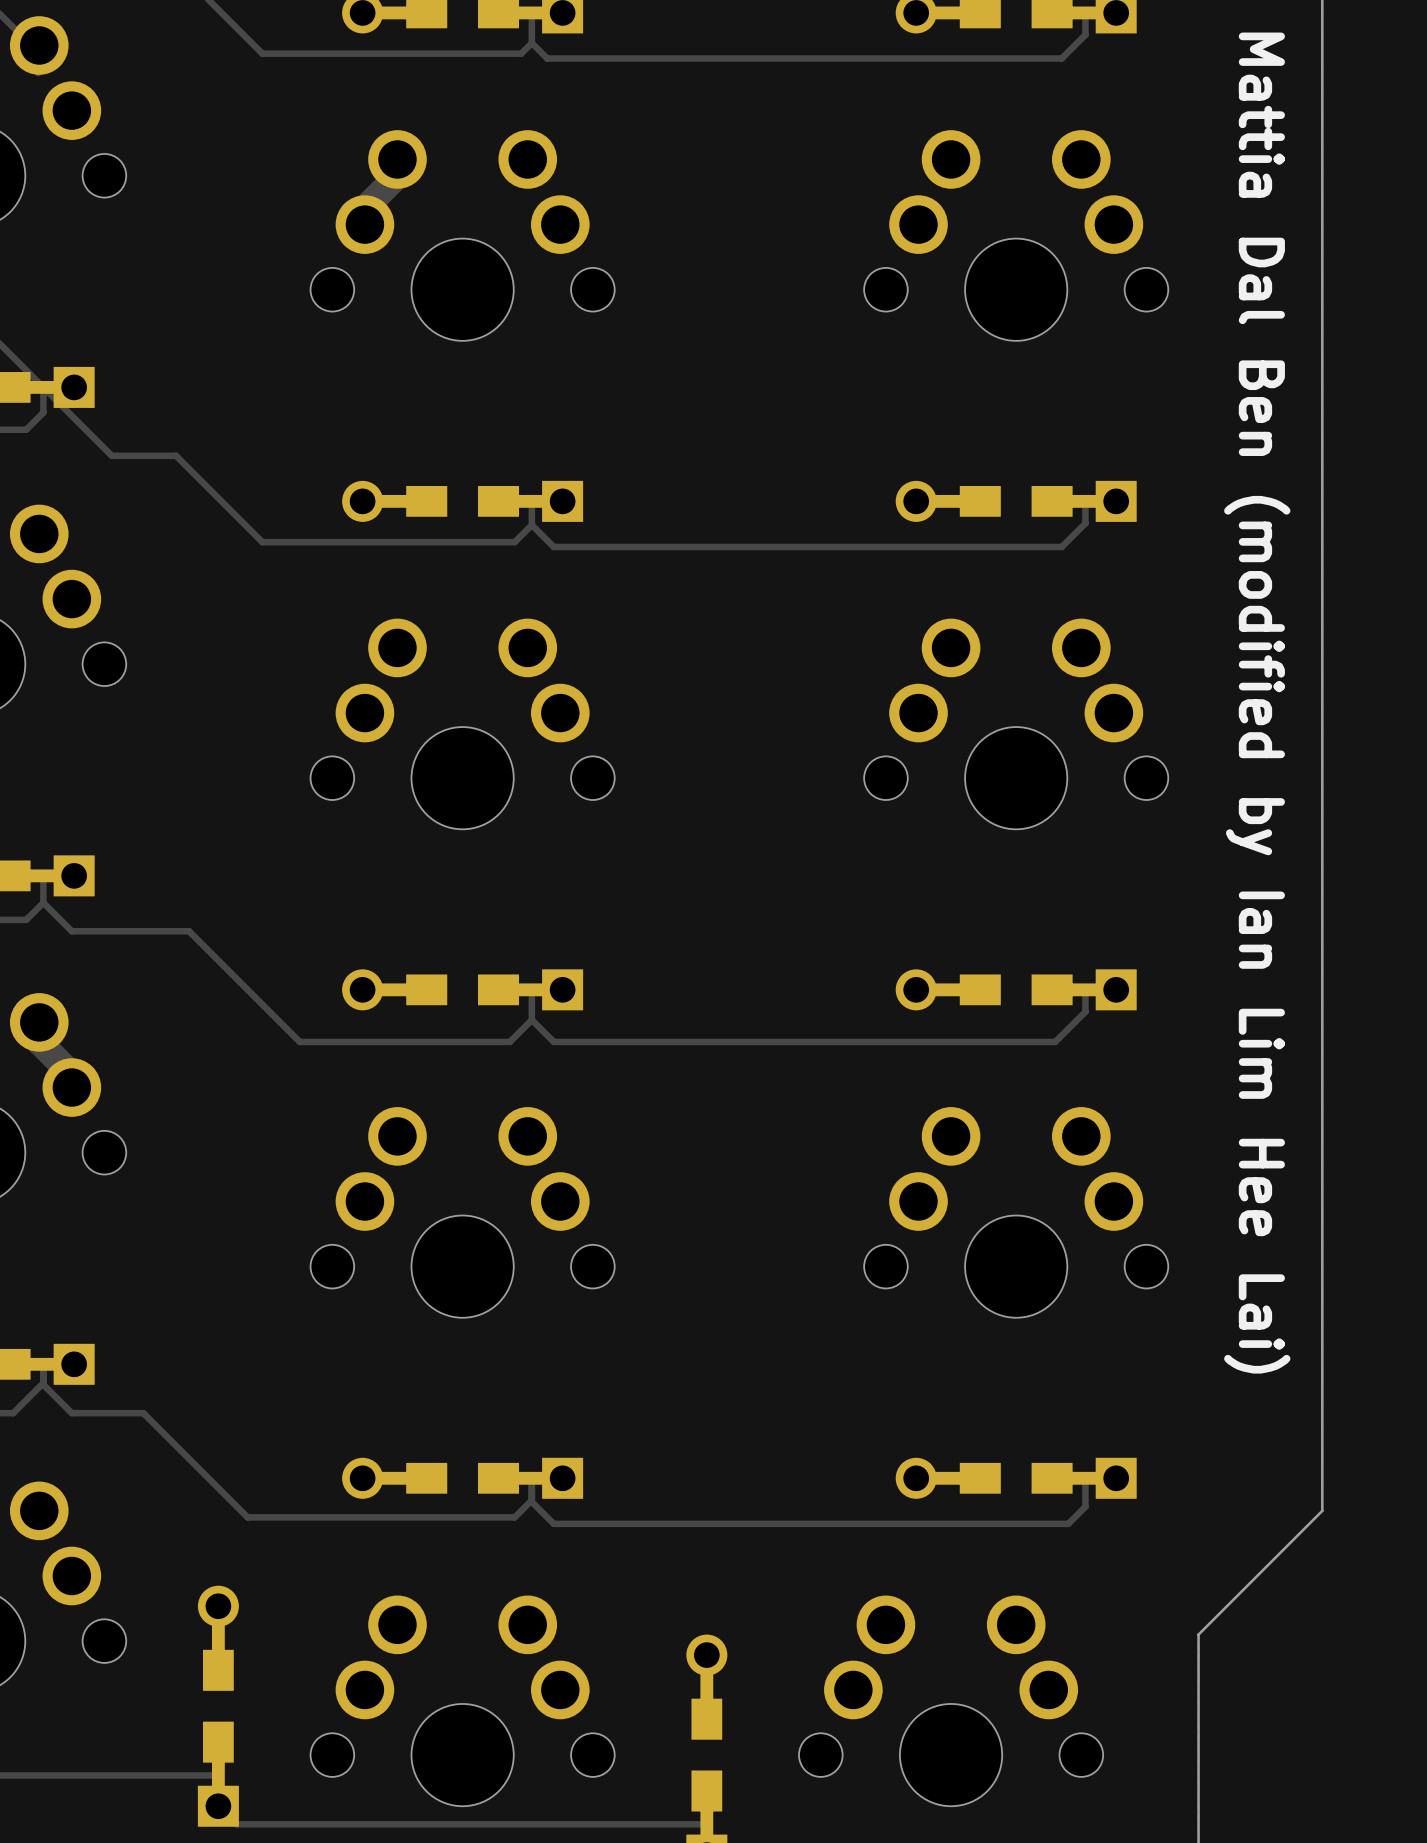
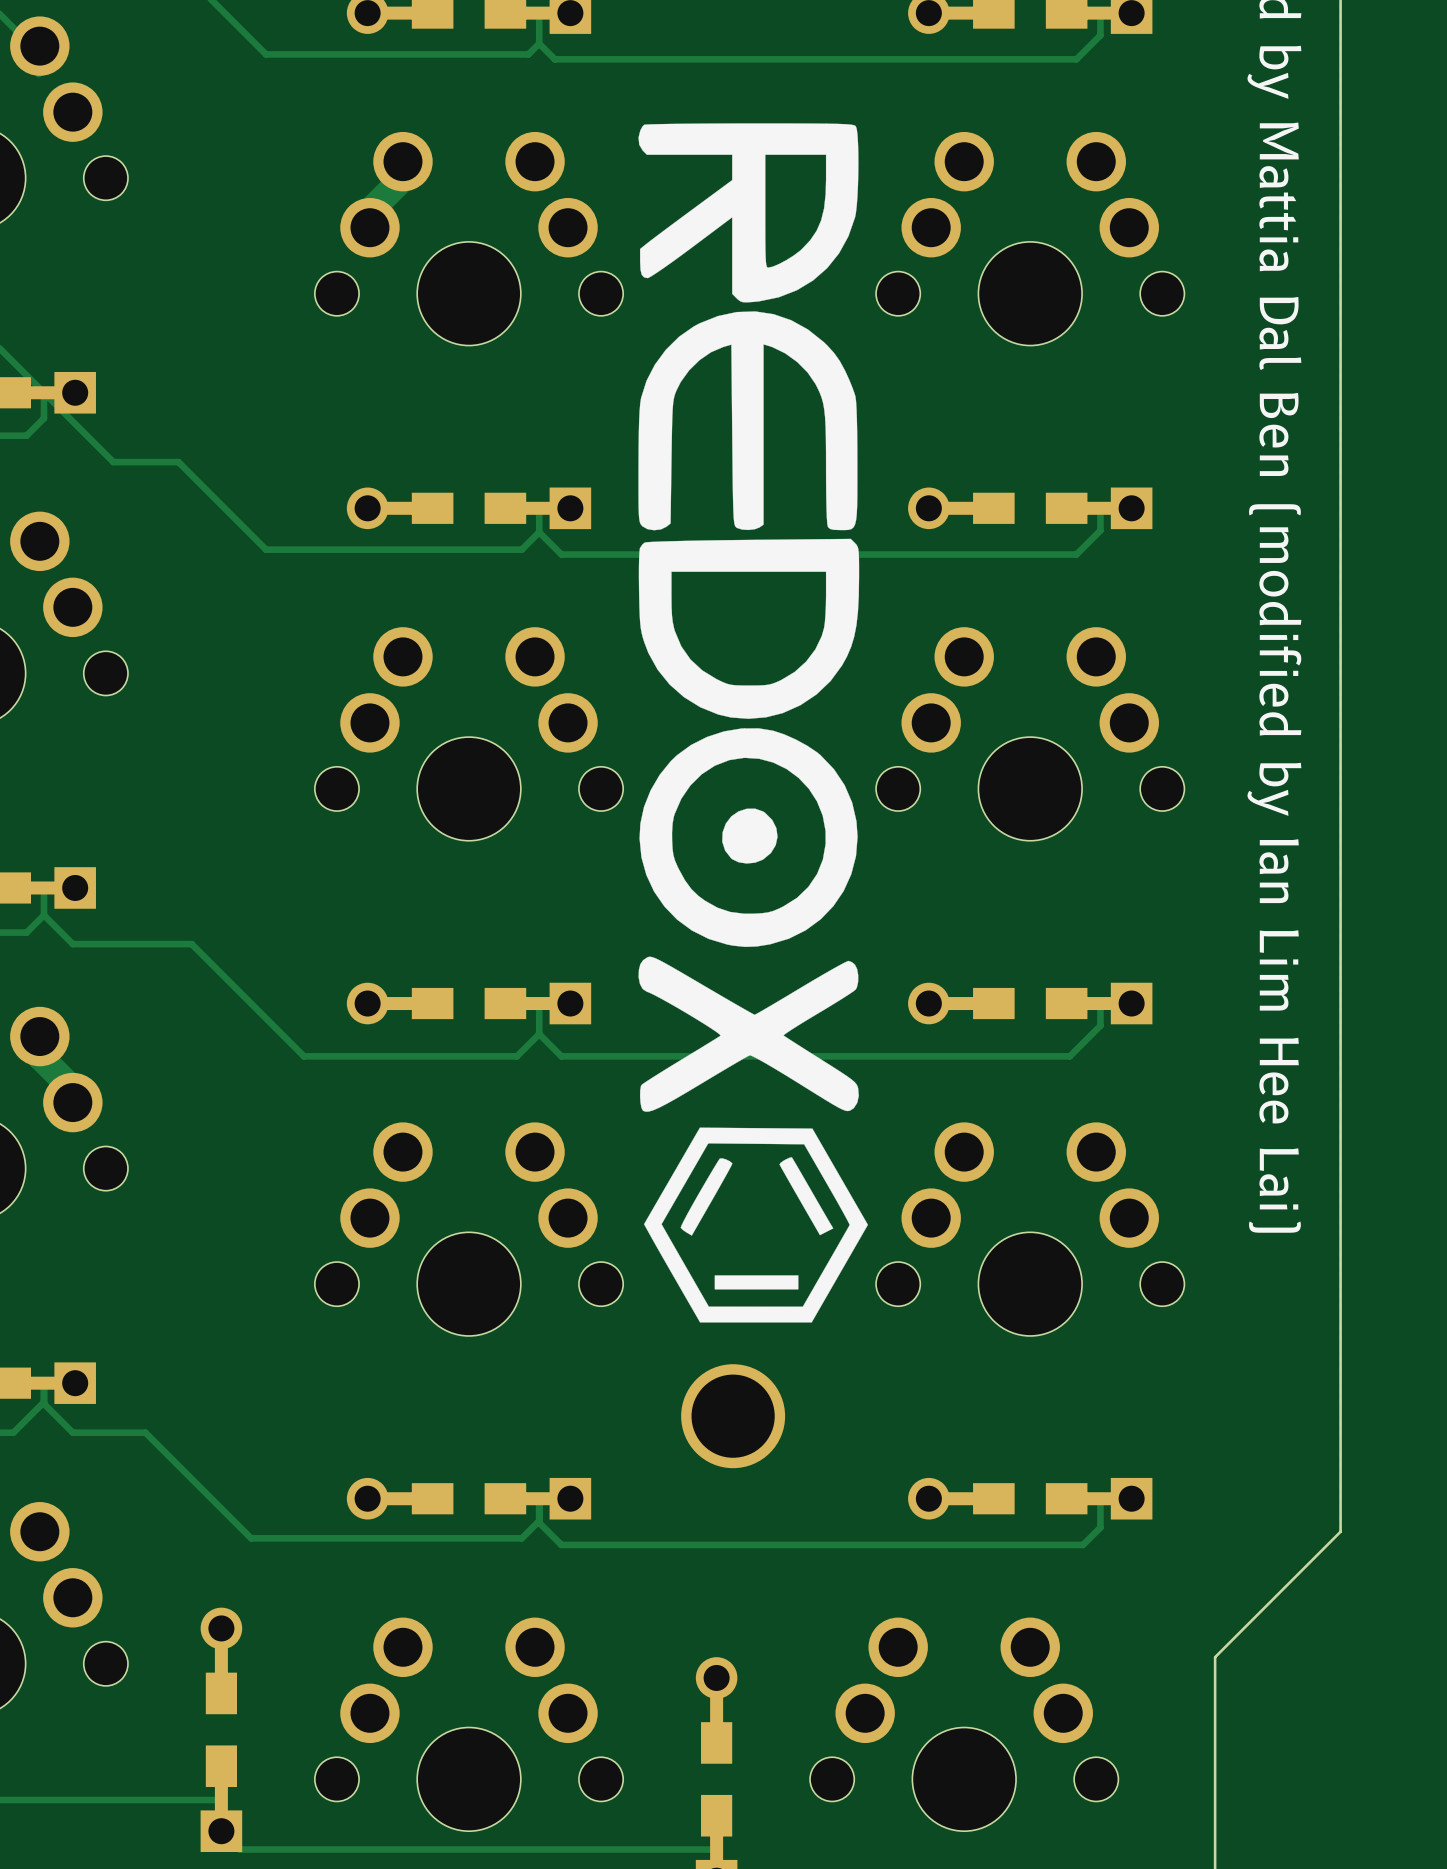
drawing: none -> [638, 123, 868, 1323]
part: none -> (733, 1416)

